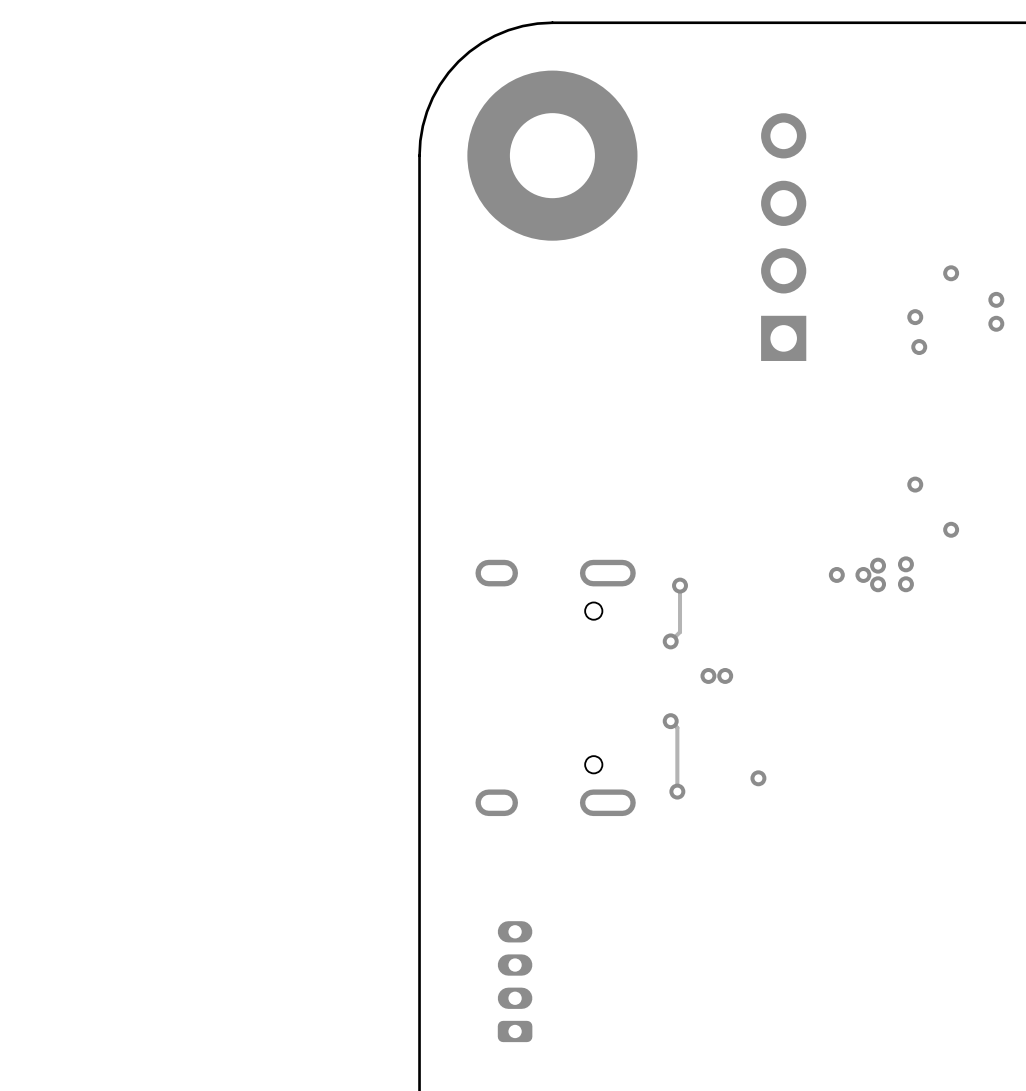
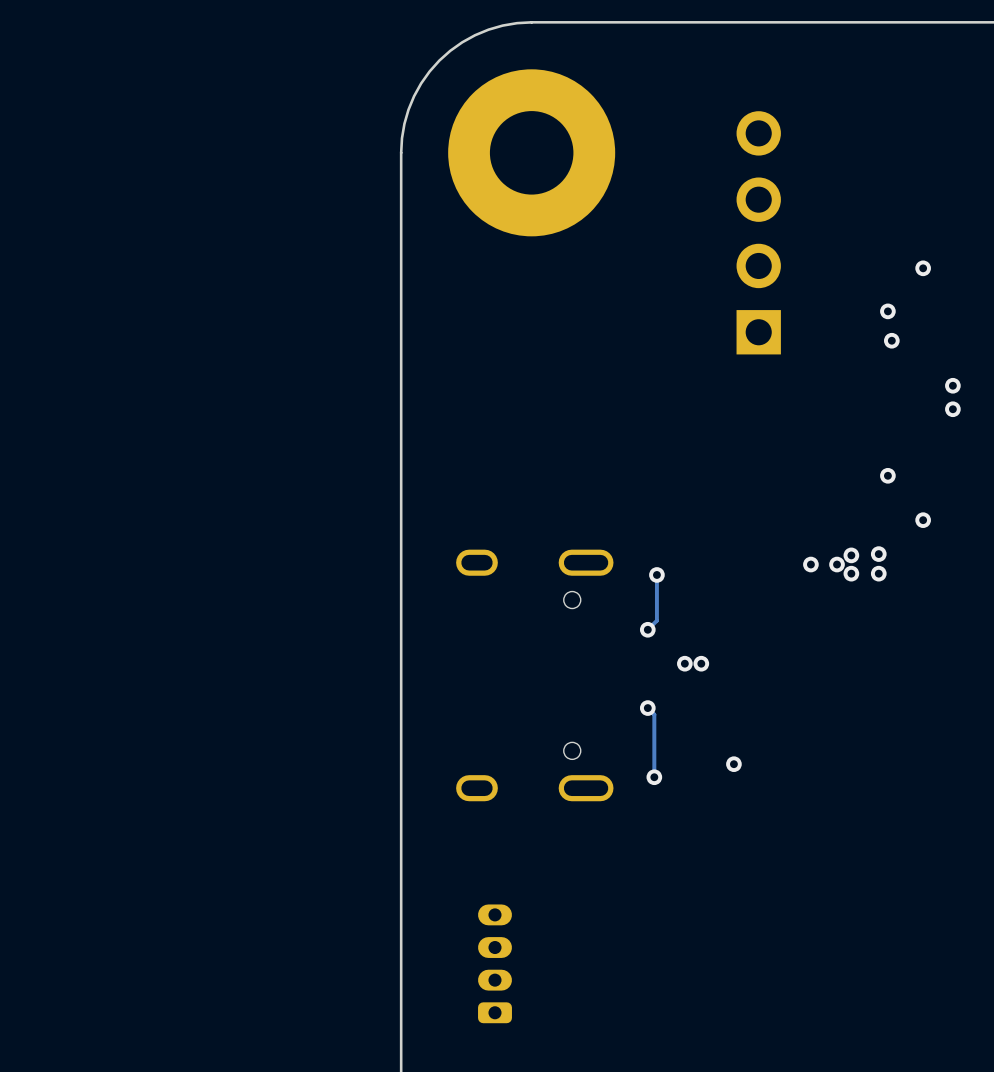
via: (996, 299) -> none
via: (996, 323) -> none
via: none -> (952, 385)
via: none -> (952, 409)

